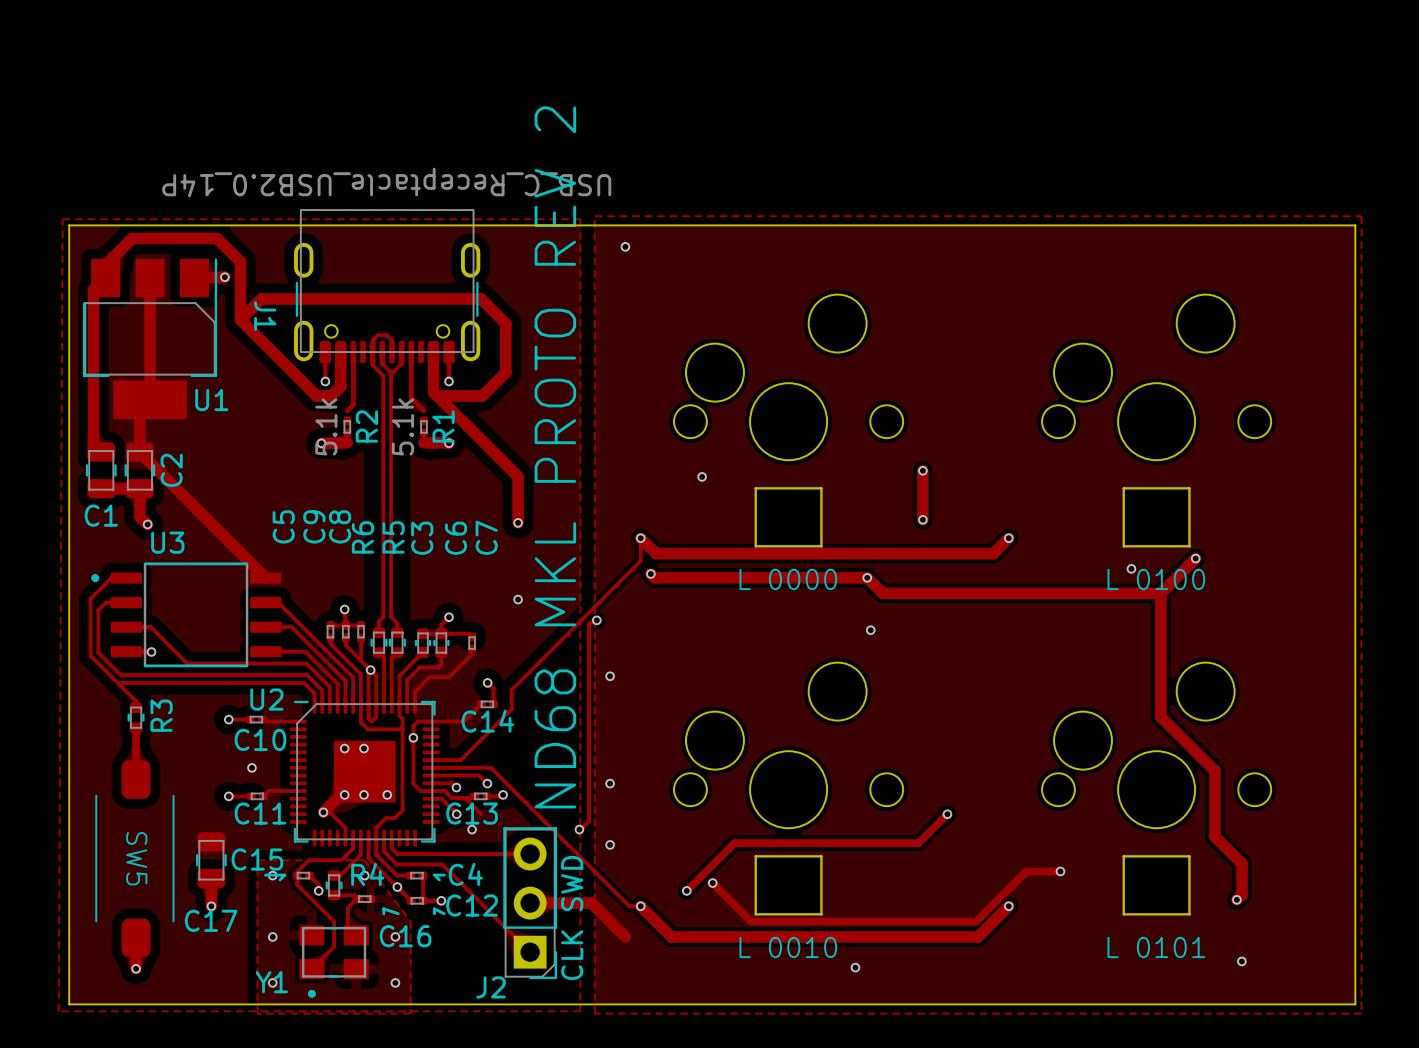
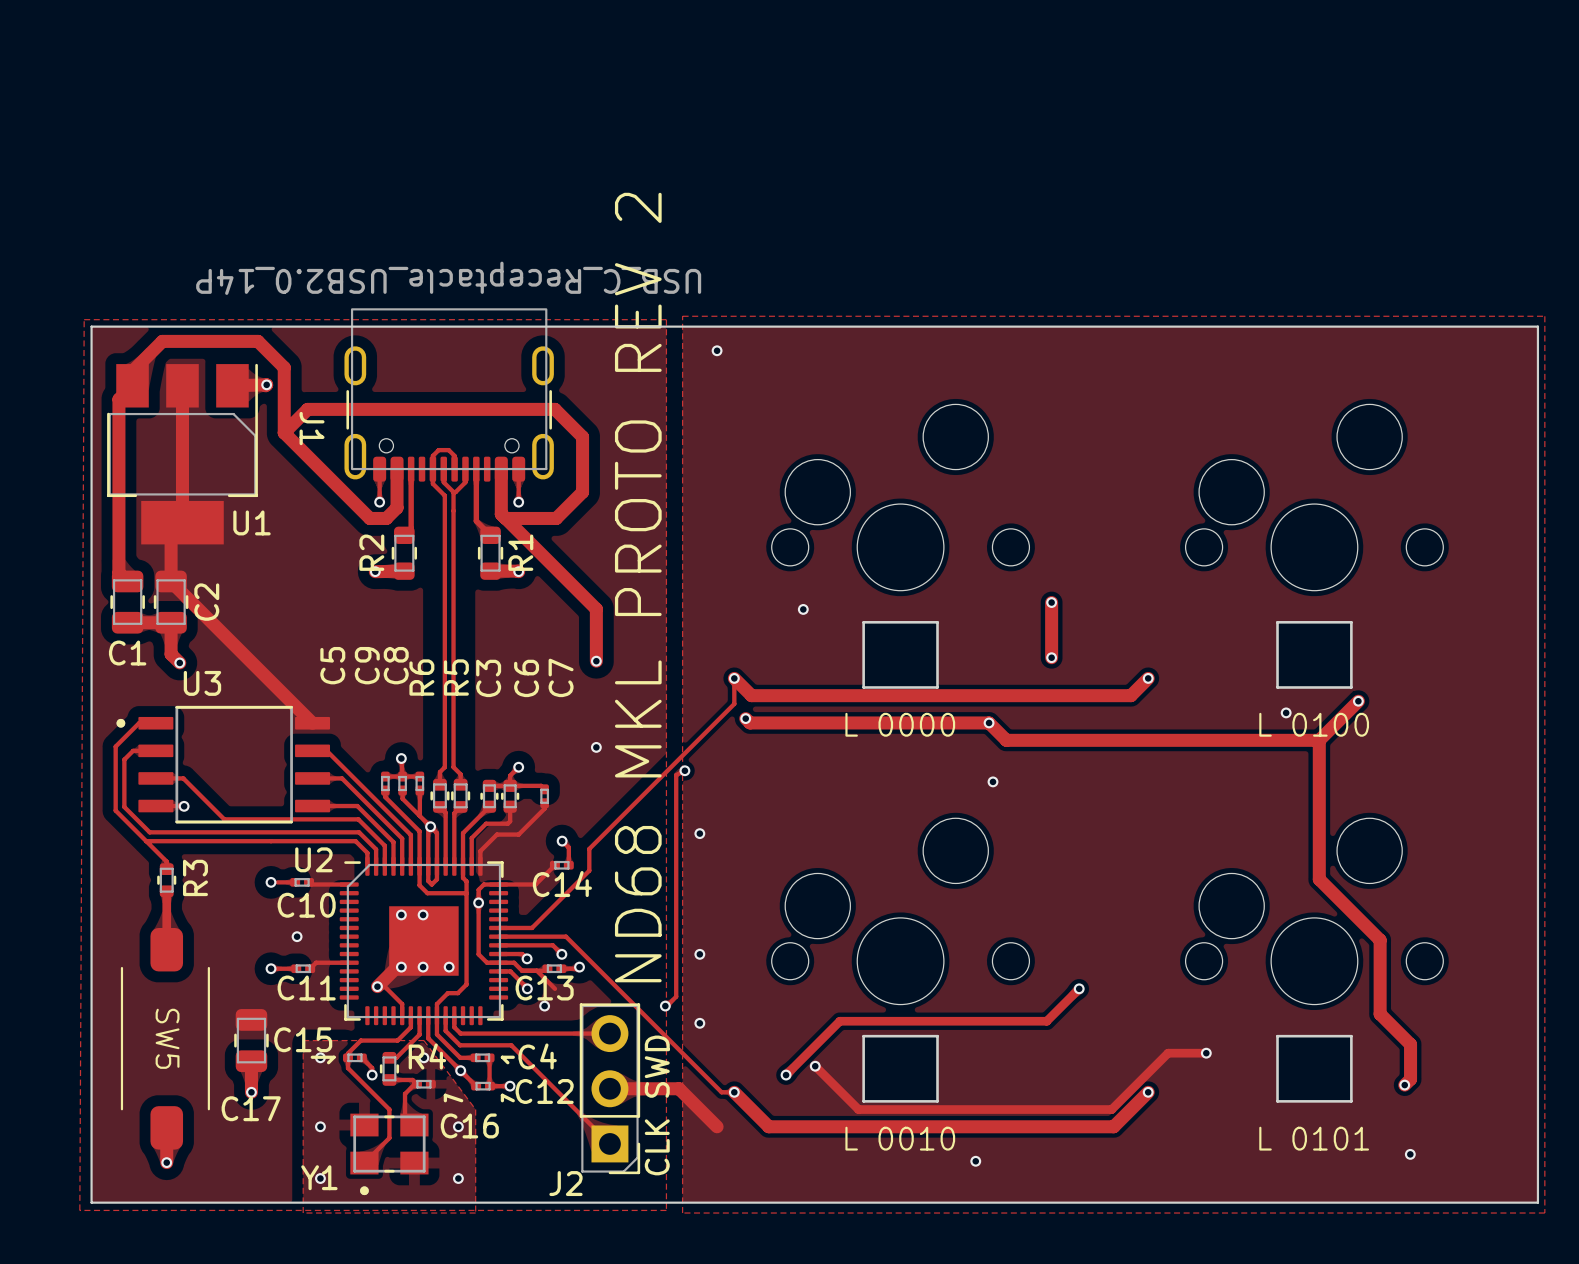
R2 footprint: [343, 416, 352, 438] -> [391, 526, 417, 580]
R1 footprint: [420, 416, 428, 438] -> [477, 526, 504, 580]
R2 value: 5.1k (326, 426) -> none
R2 name position: R2 (366, 426) -> R2 (371, 552)
R1 value: 5.1k (402, 426) -> none

